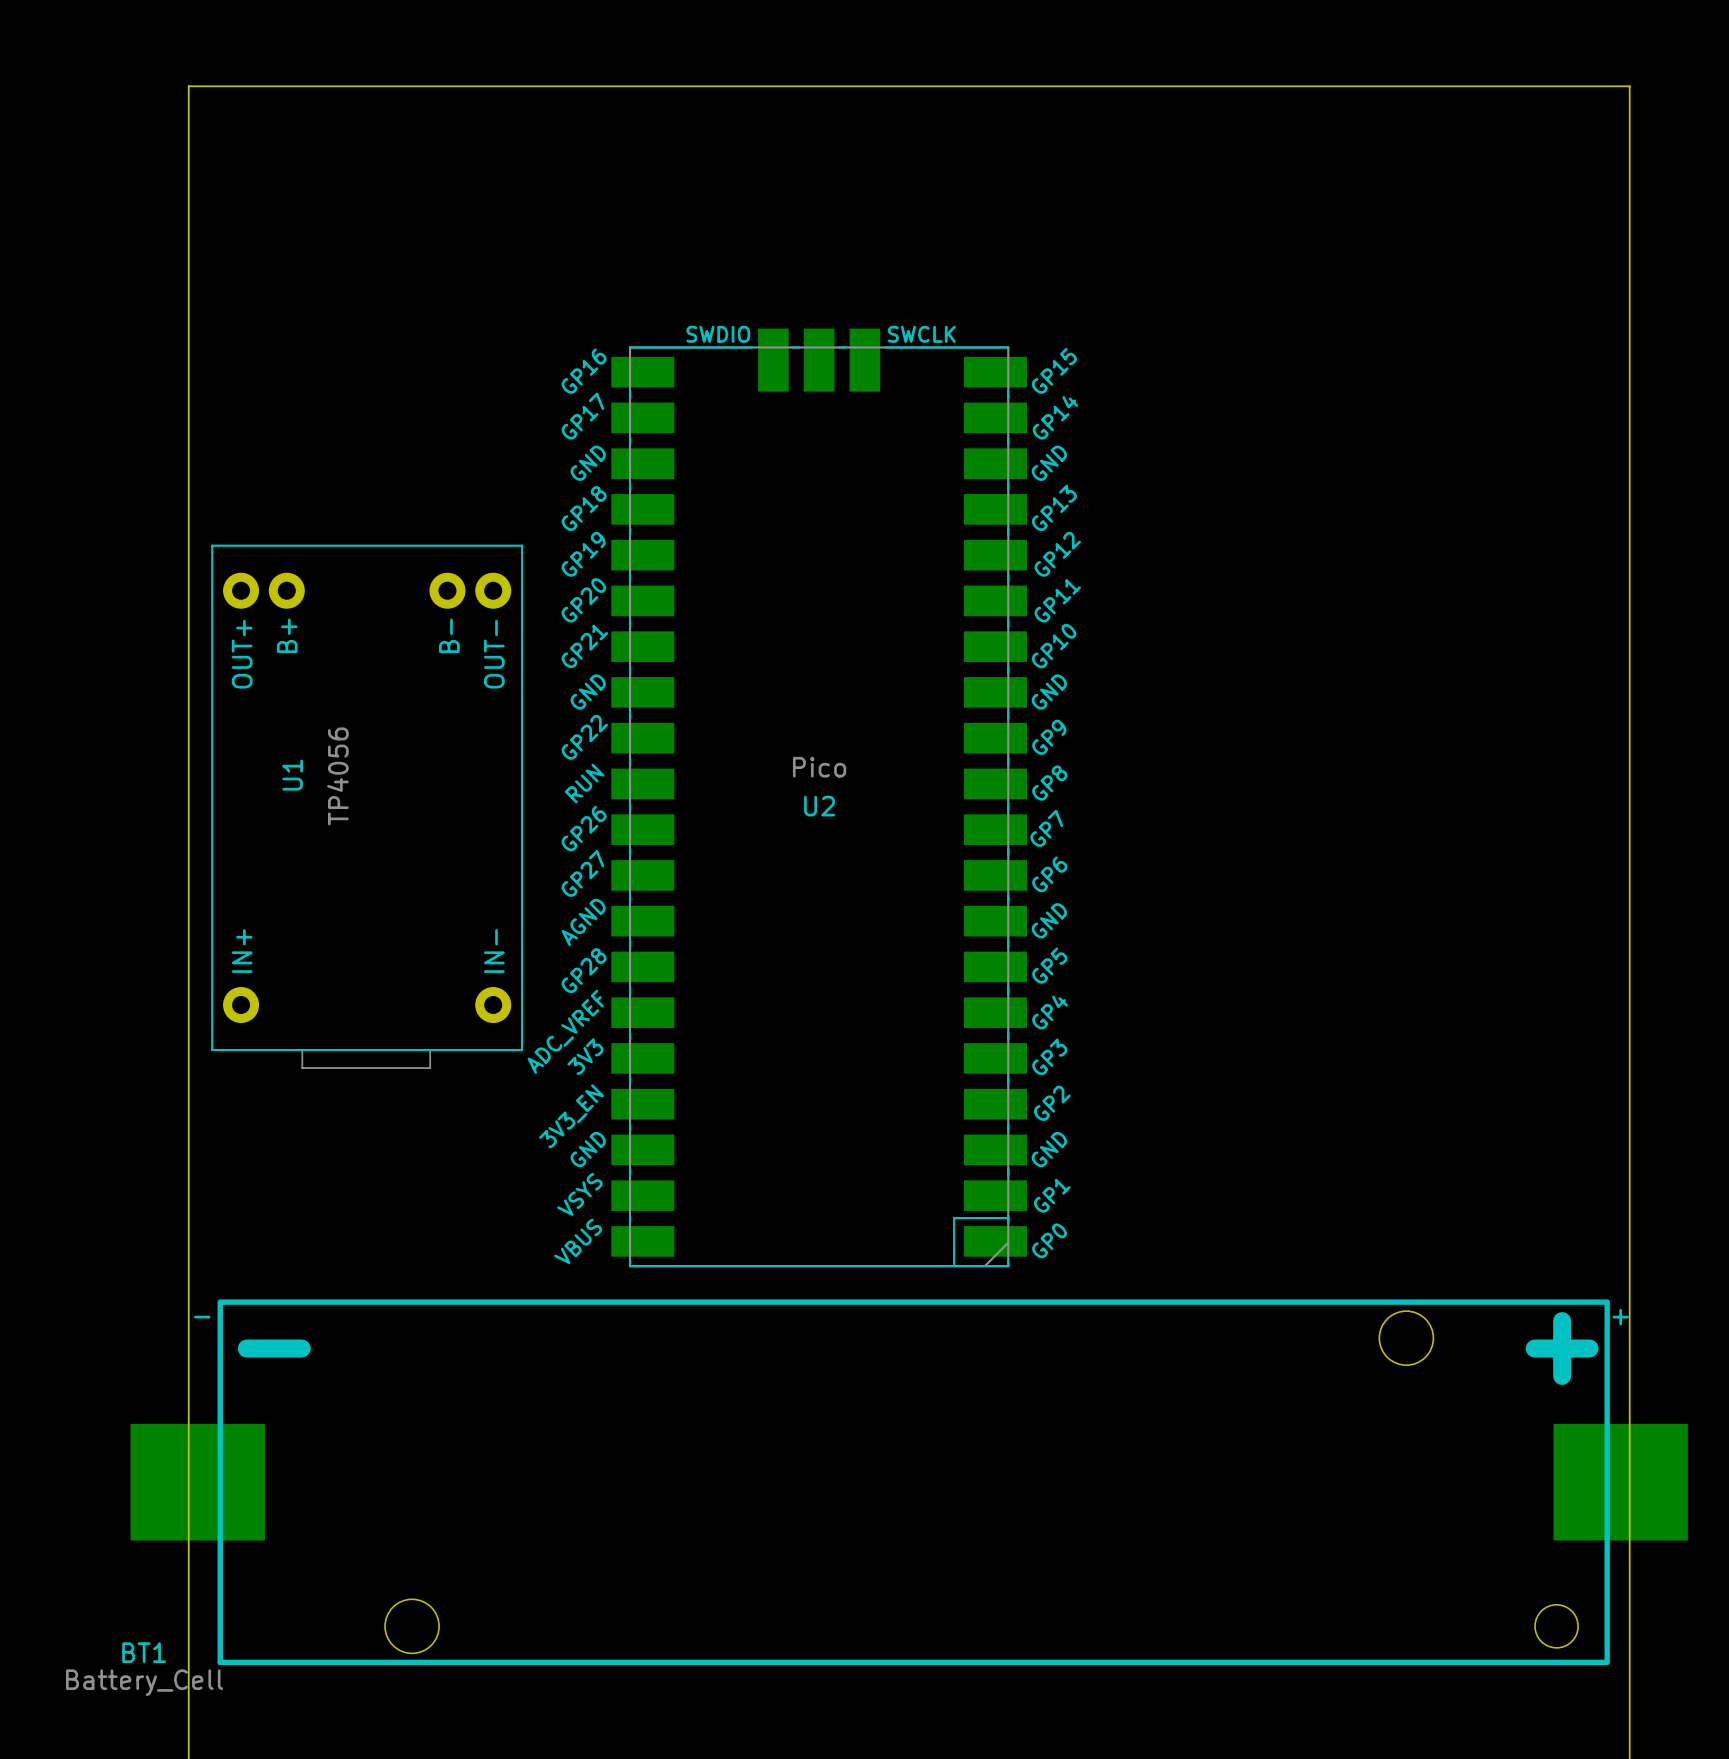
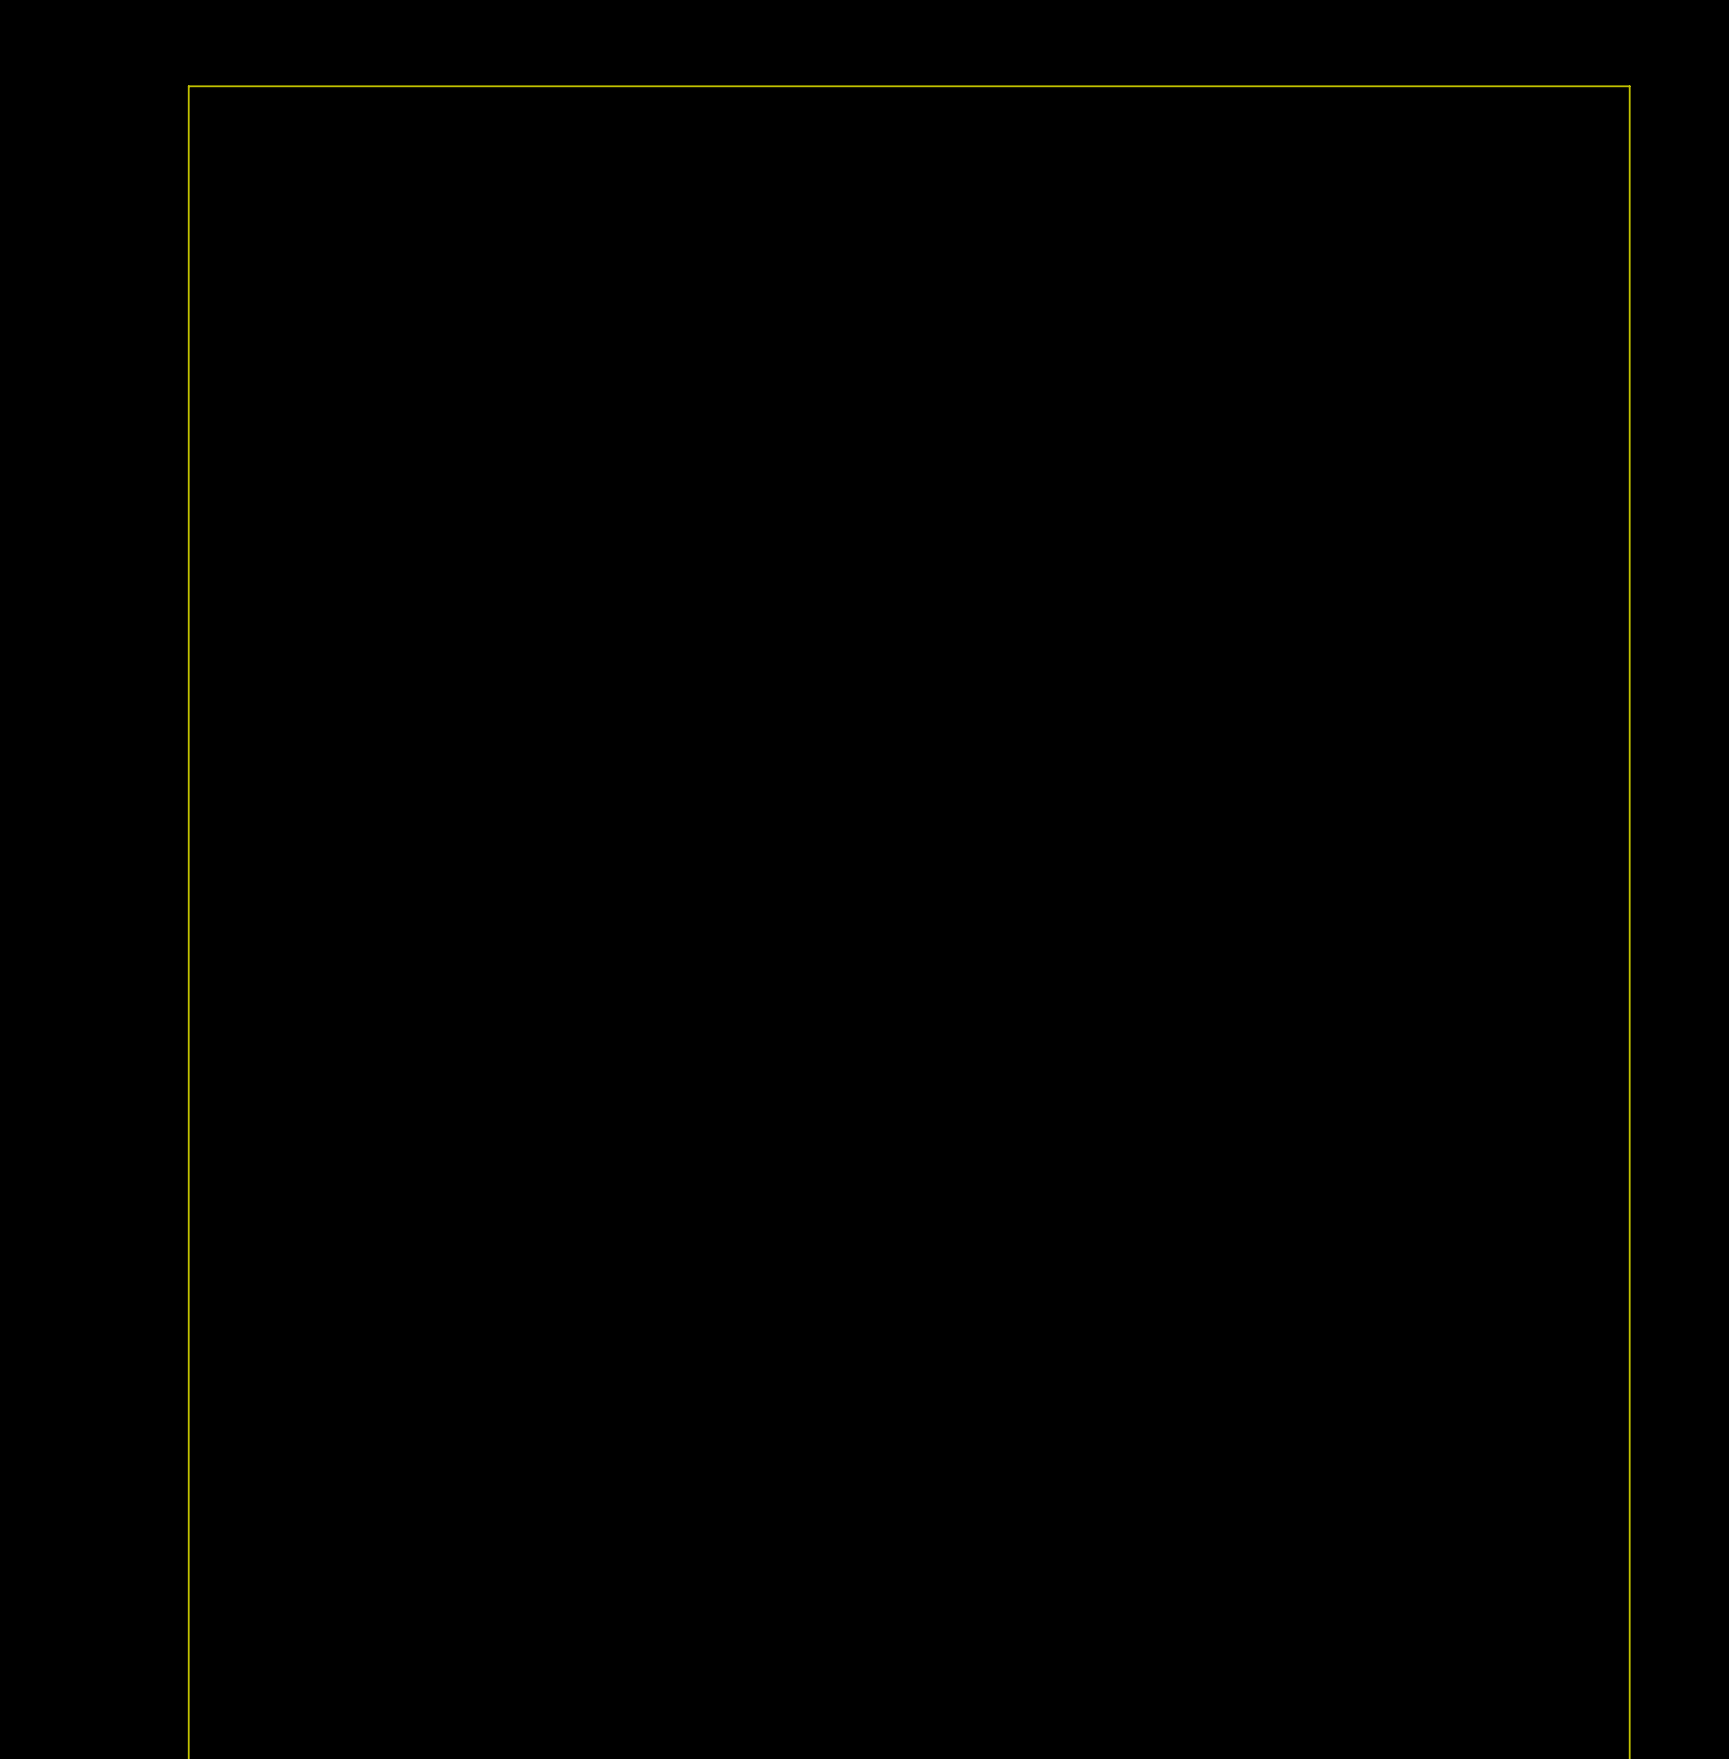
U2: Pico (819, 797) -> none
U1: TP4056 (367, 806) -> none
BT1: Battery_Cell (909, 1482) -> none

